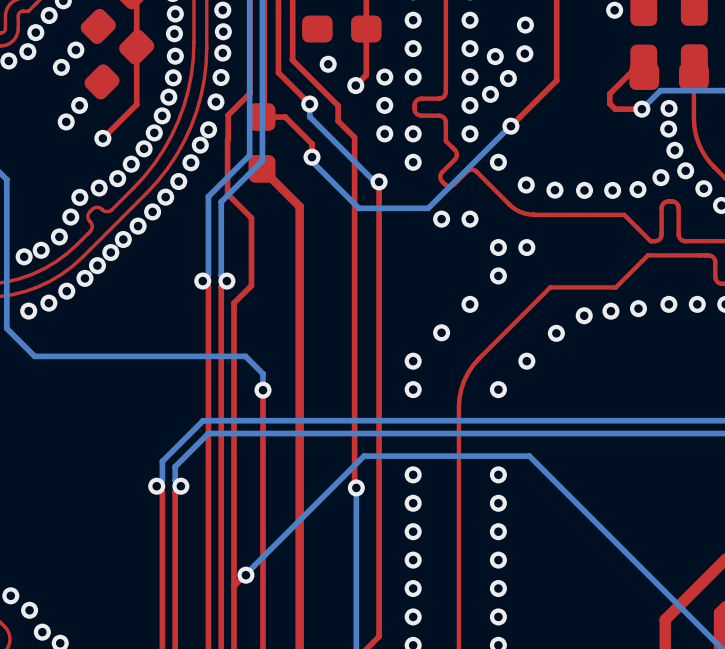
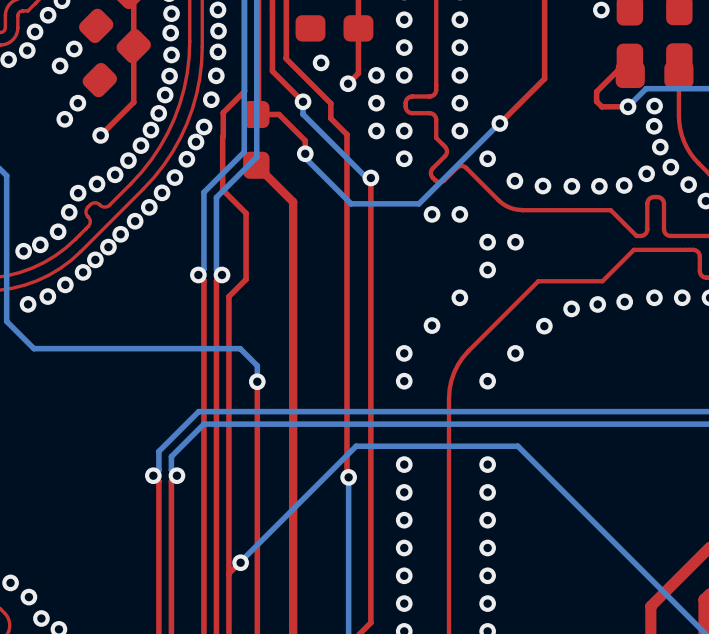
via: (525, 25) -> none
via: (524, 53) -> none
via: (495, 56) -> none
via: (508, 78) -> none
via: (490, 94) -> none

